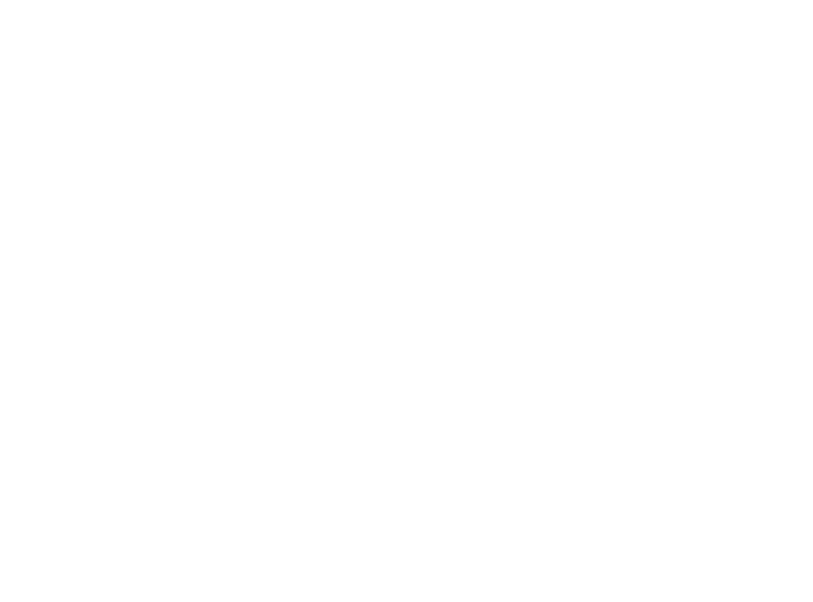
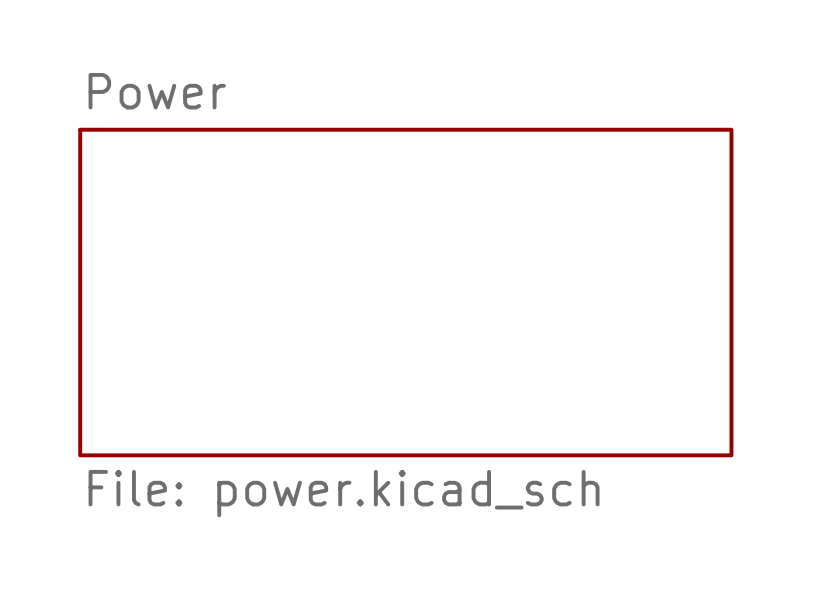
sheet Power: none -> File: power.kicad_sch (405, 292)

